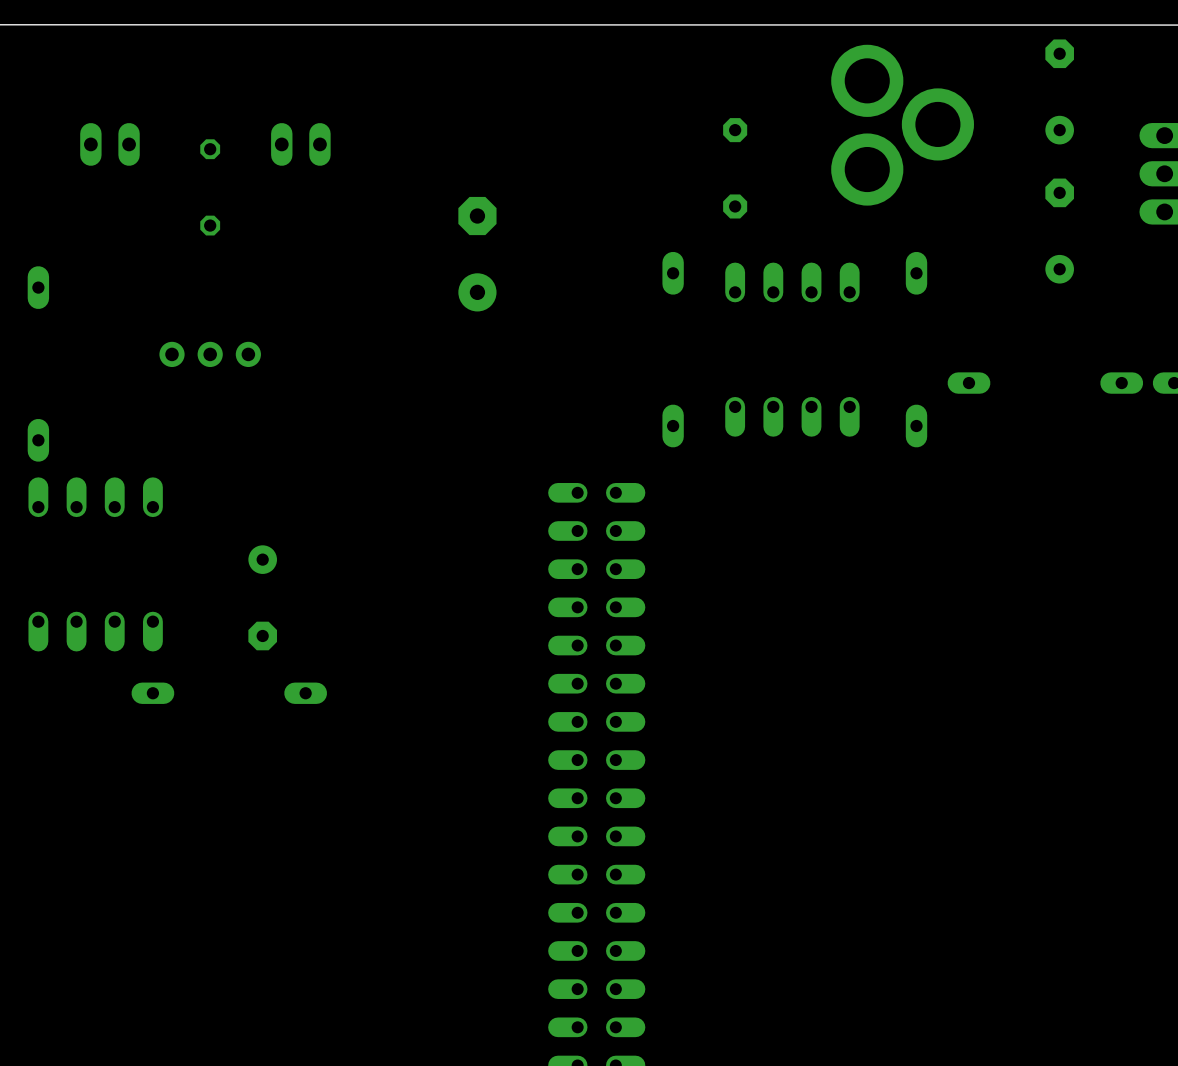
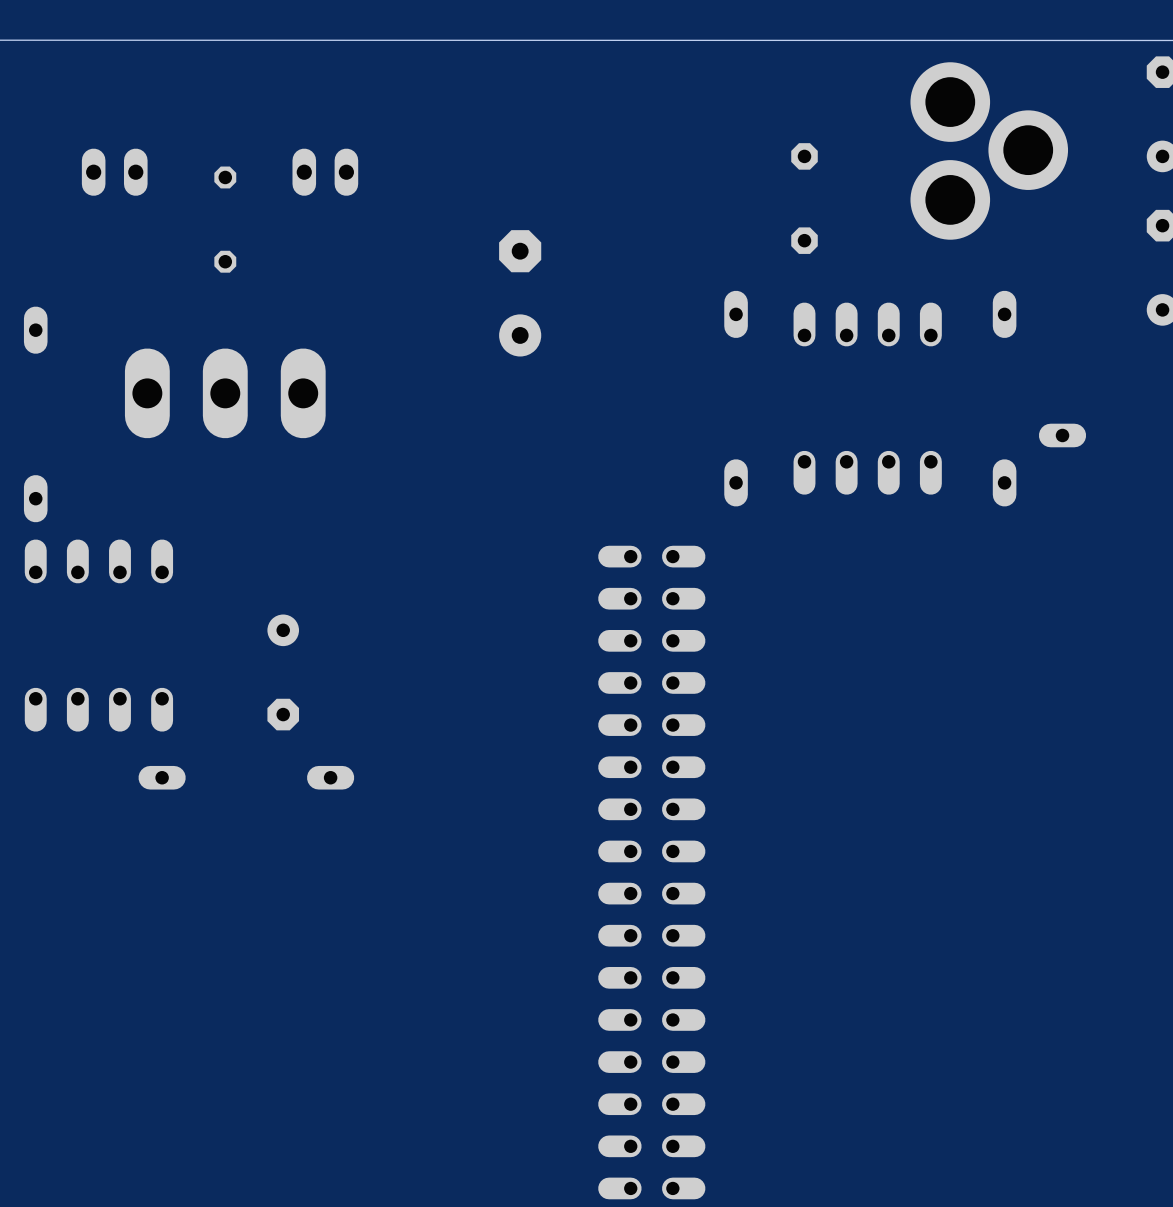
part footprint: [159, 341, 261, 368] -> [124, 348, 326, 439]

